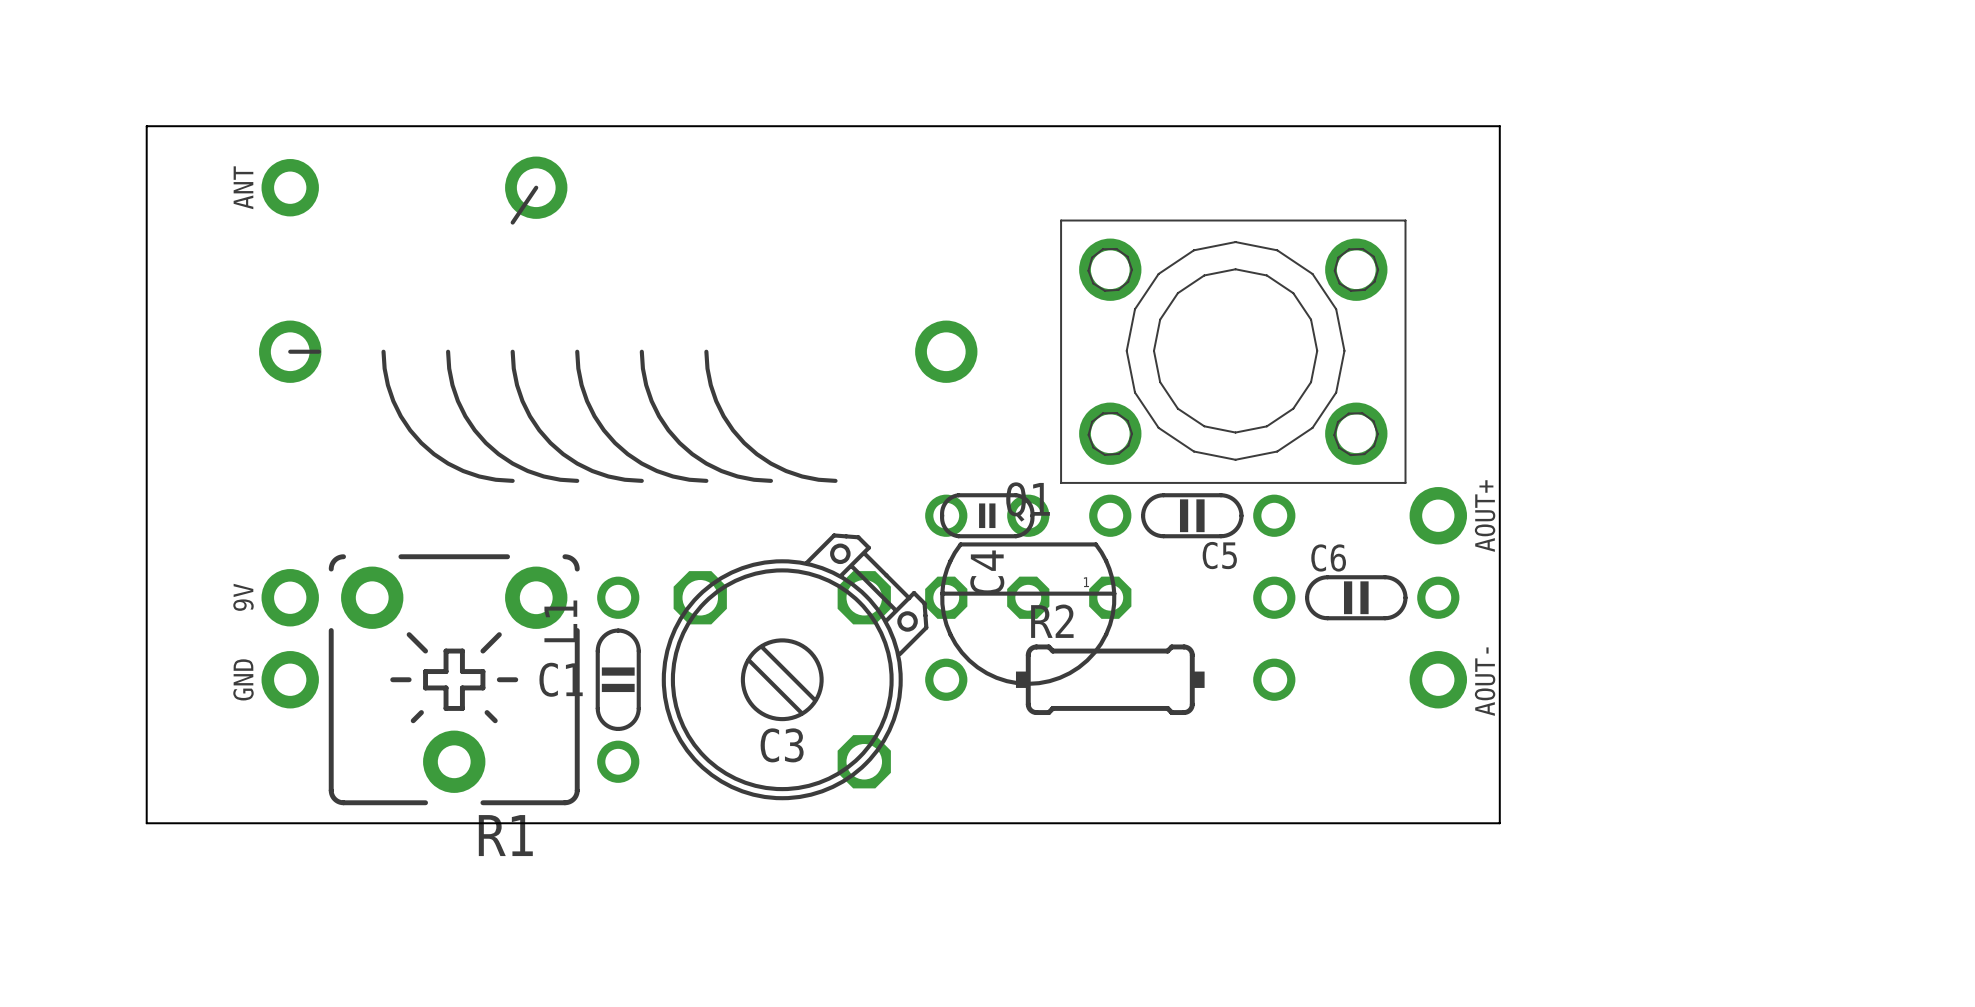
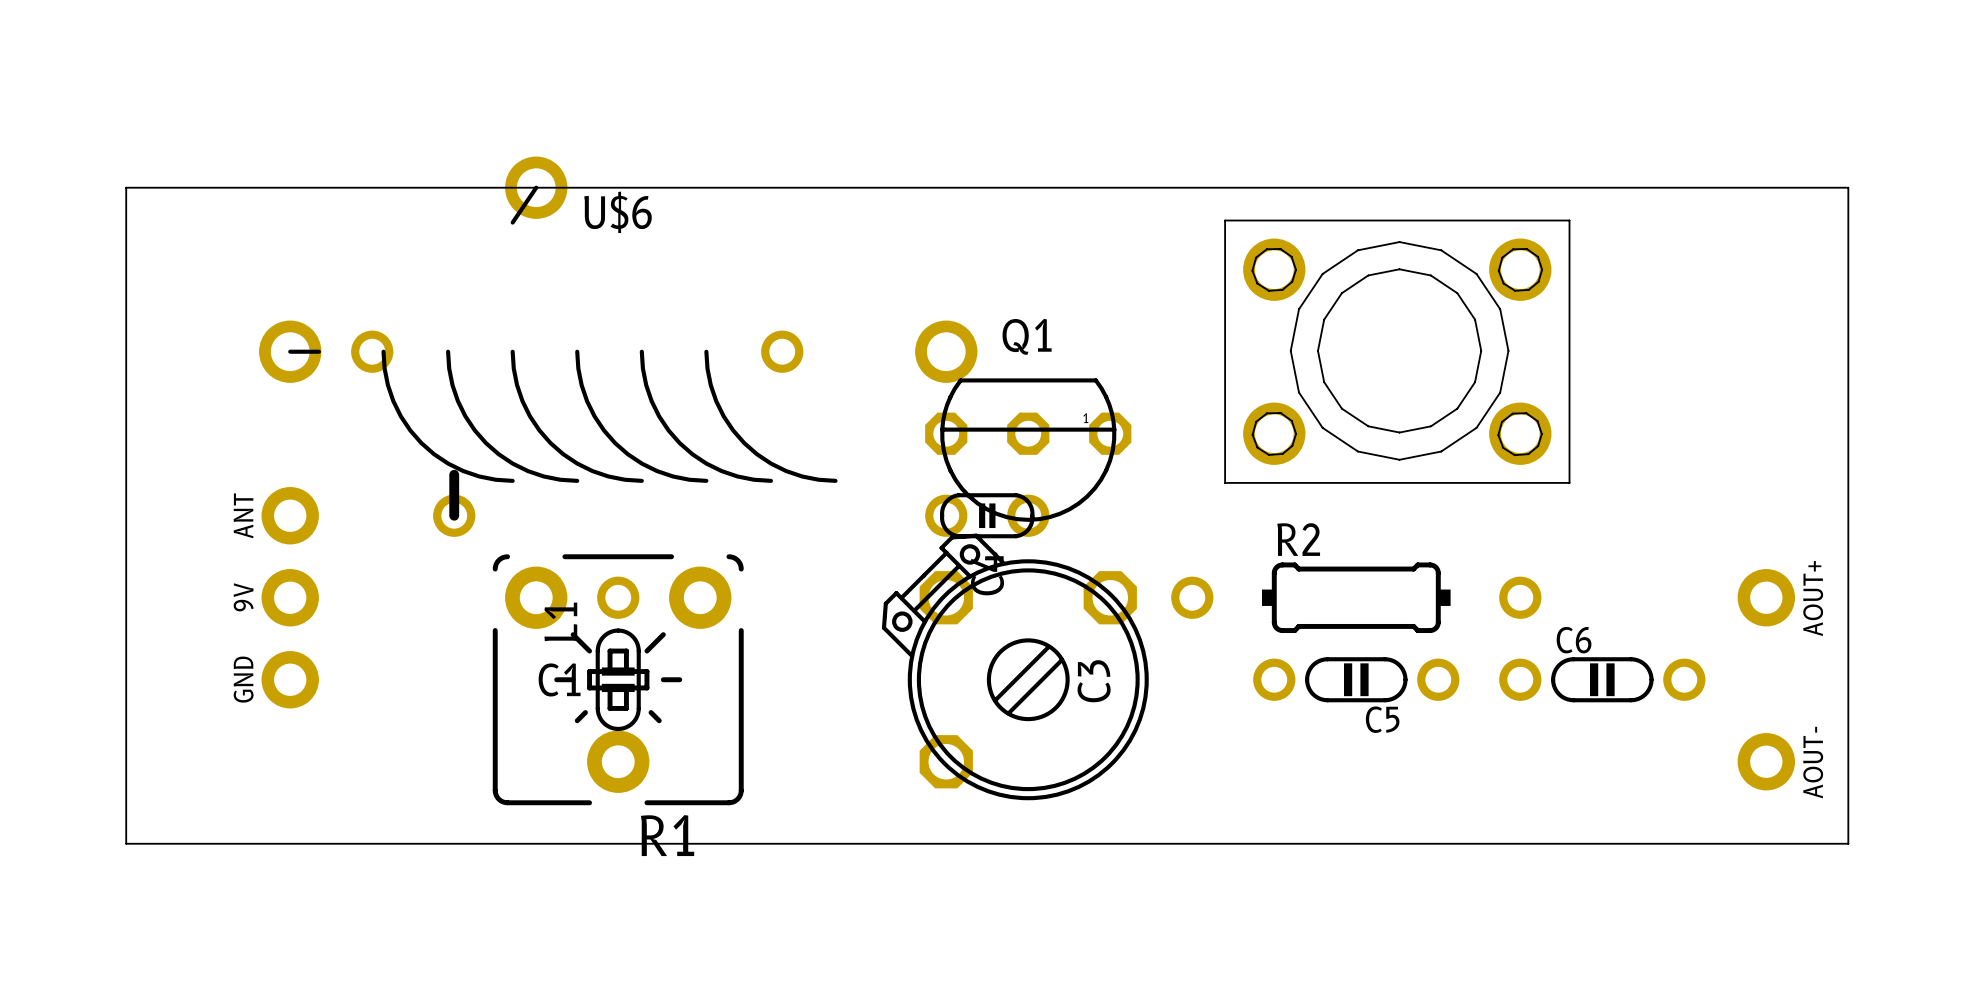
board edge: (146, 126) (1499, 126) (1499, 823) (146, 823) (146, 126) -> (126, 187) (126, 843) (1848, 843) (1848, 187) (126, 187)
ANT position: (290, 187) -> (290, 515)
part position: (1233, 351) -> (1397, 351)
U$6: none -> (577, 433)
C5 position: (1192, 515) -> (1356, 679)
AOUT+ position: (1438, 515) -> (1766, 597)
C6 position: (1356, 597) -> (1602, 679)
Q1 position: (1028, 614) -> (1028, 450)
C3 rotation: 0° (795, 666) -> 90° counterclockwise (1015, 666)
C3 position: (795, 666) -> (1015, 666)
R1 position: (454, 679) -> (618, 679)
R2 position: (1110, 679) -> (1356, 597)
AOUT- position: (1438, 679) -> (1766, 761)

